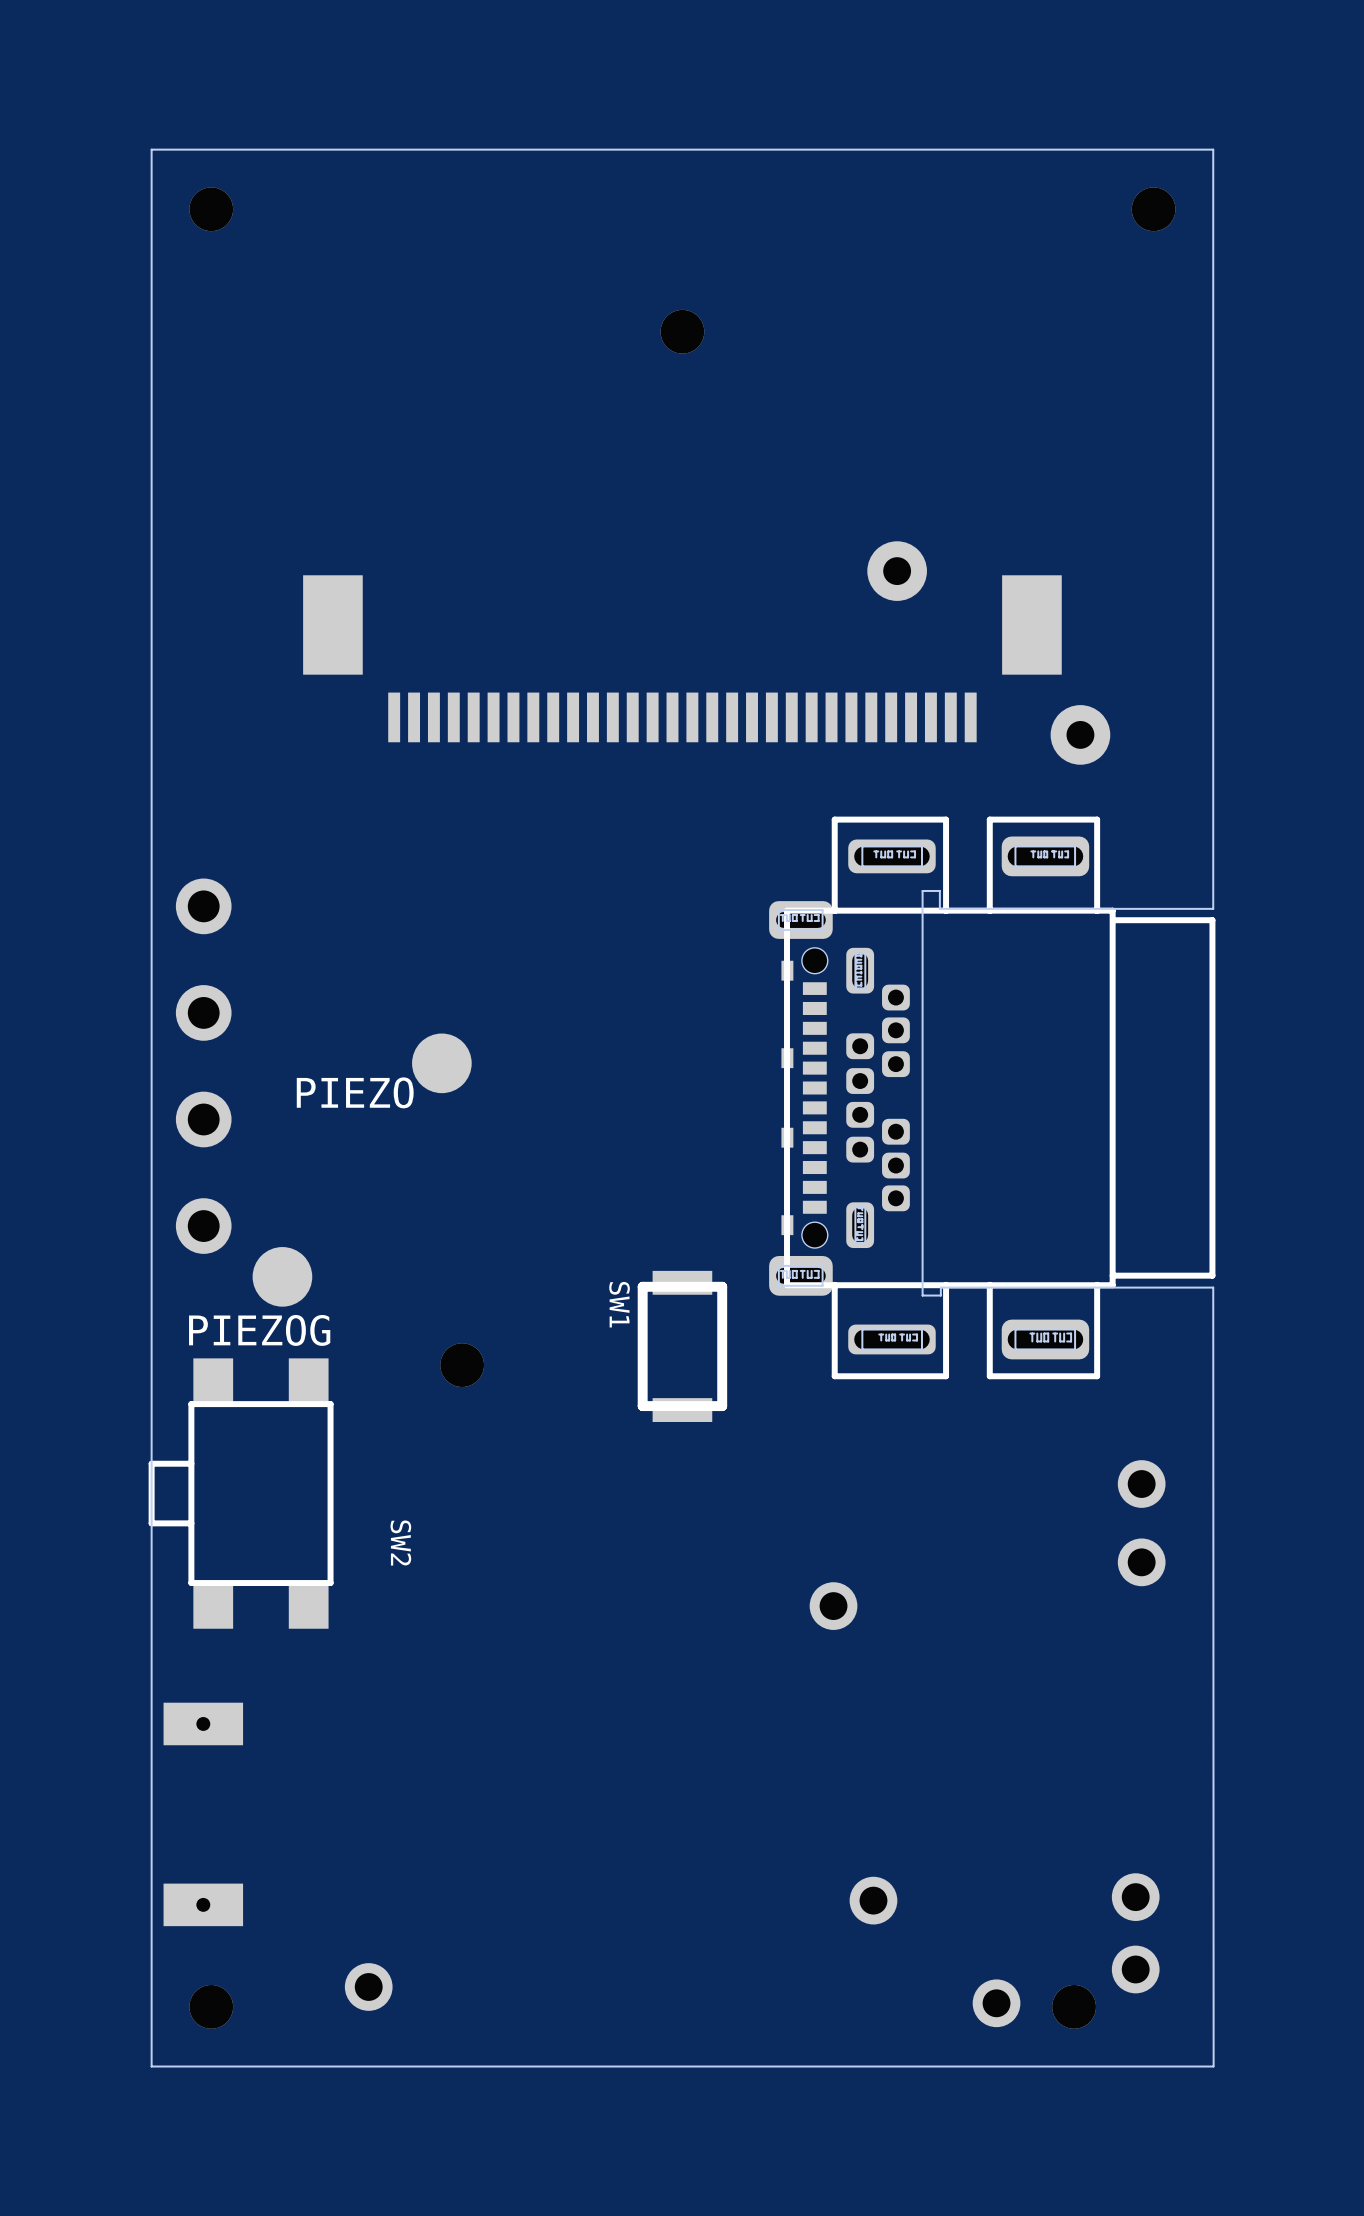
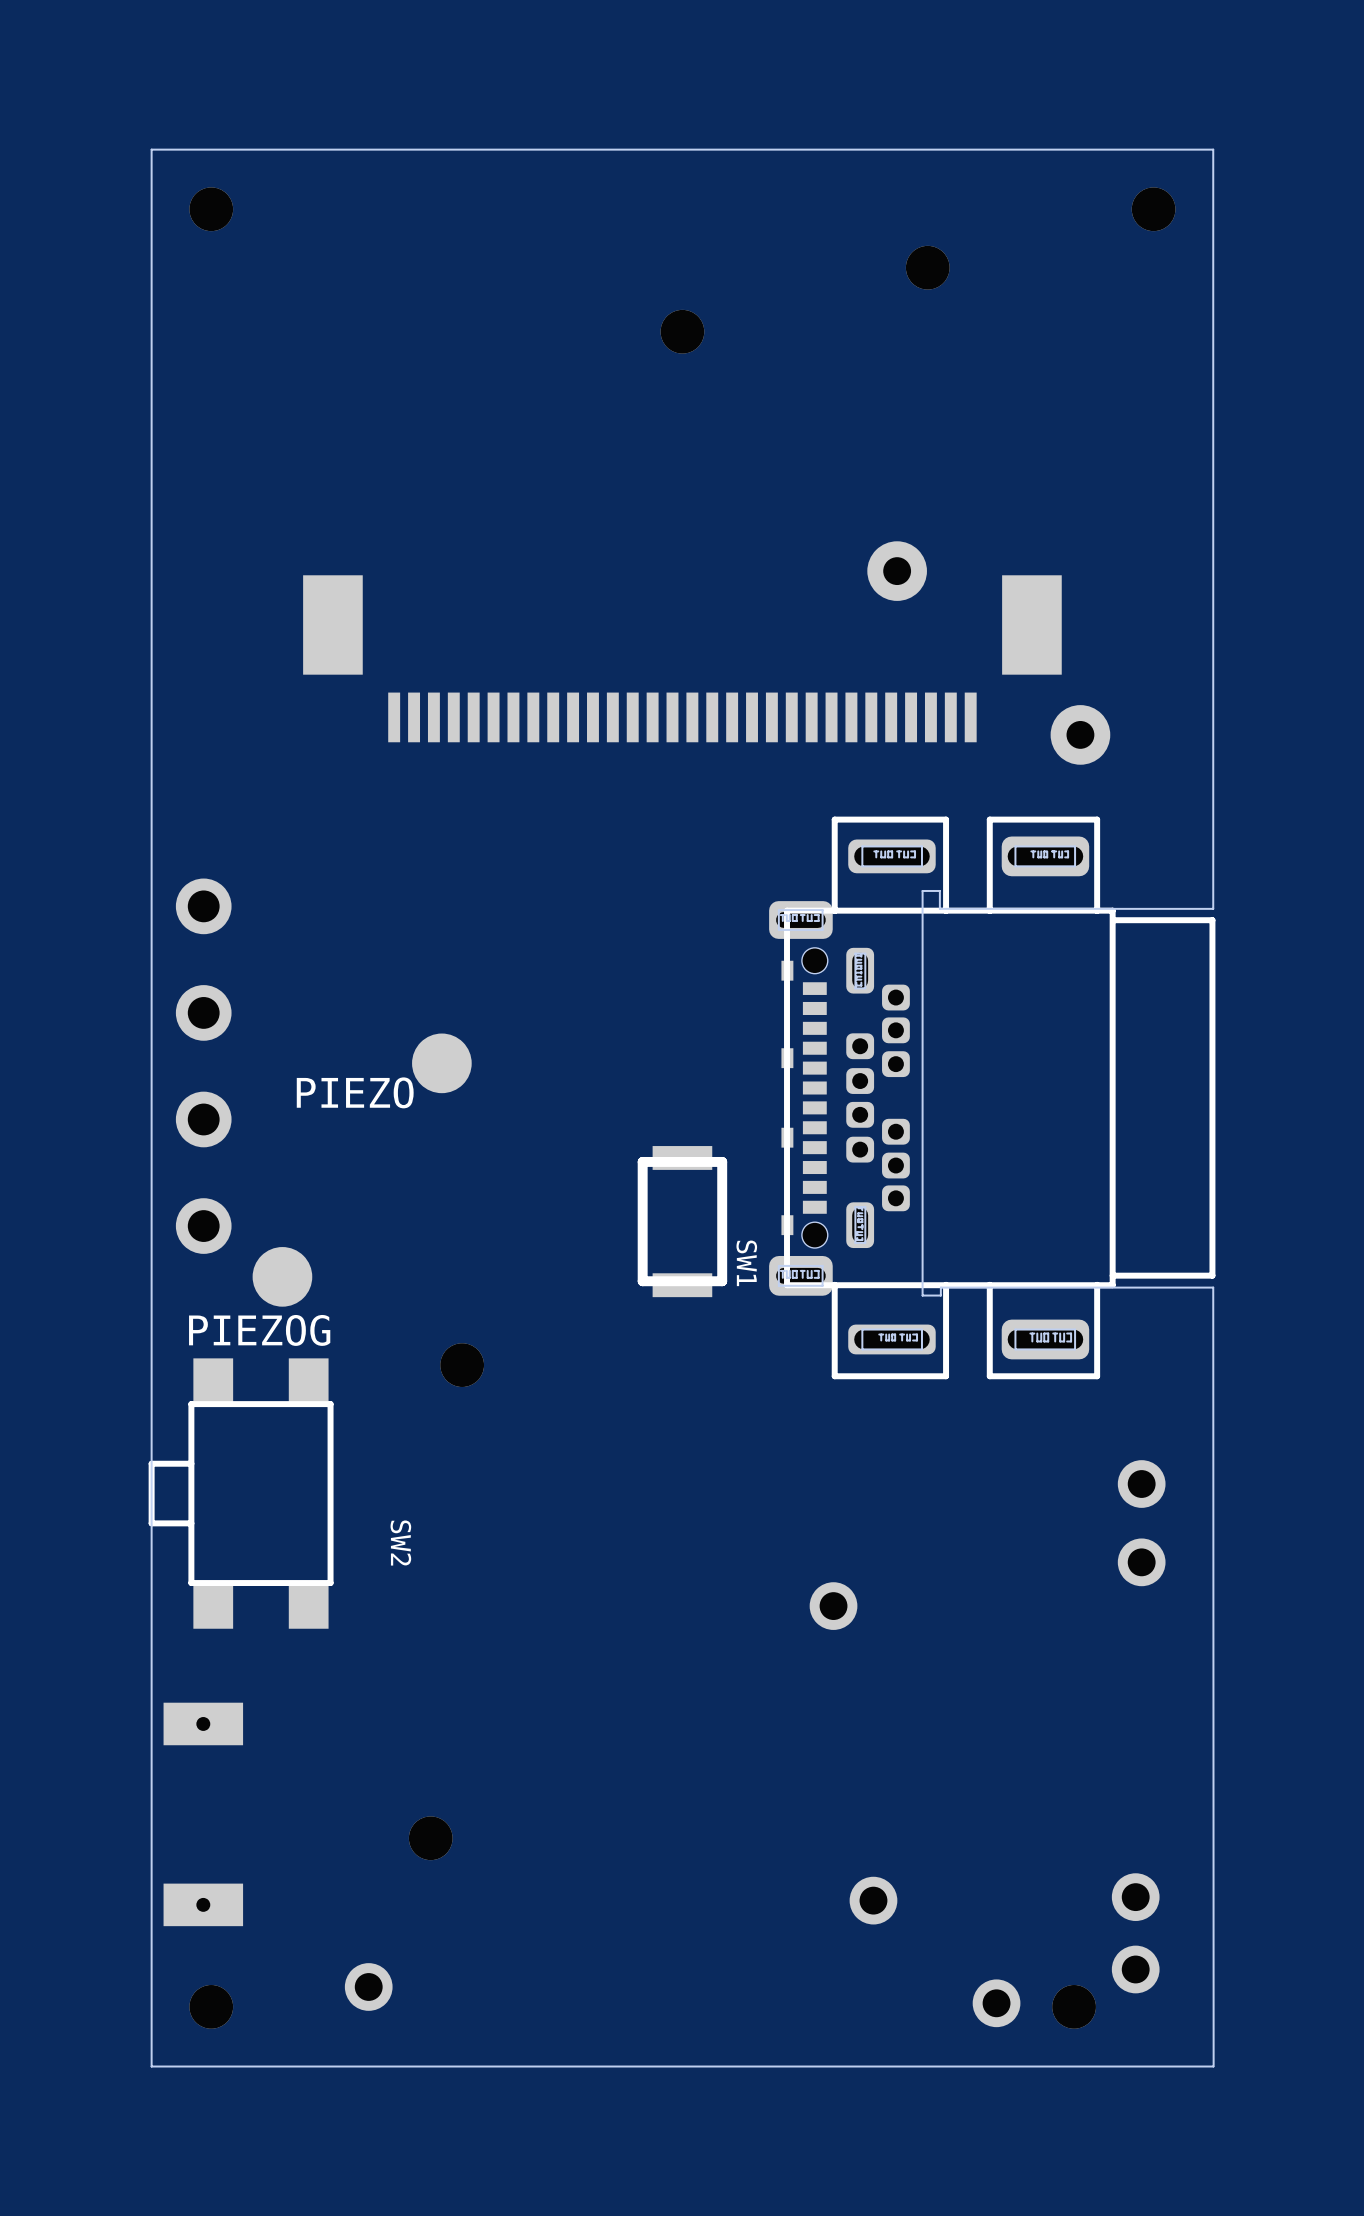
part: none -> (927, 267)
SW1 name position: SW1 (619, 1304) -> SW1 (746, 1263)
SW1 position: (682, 1346) -> (682, 1221)
part: none -> (430, 1838)

